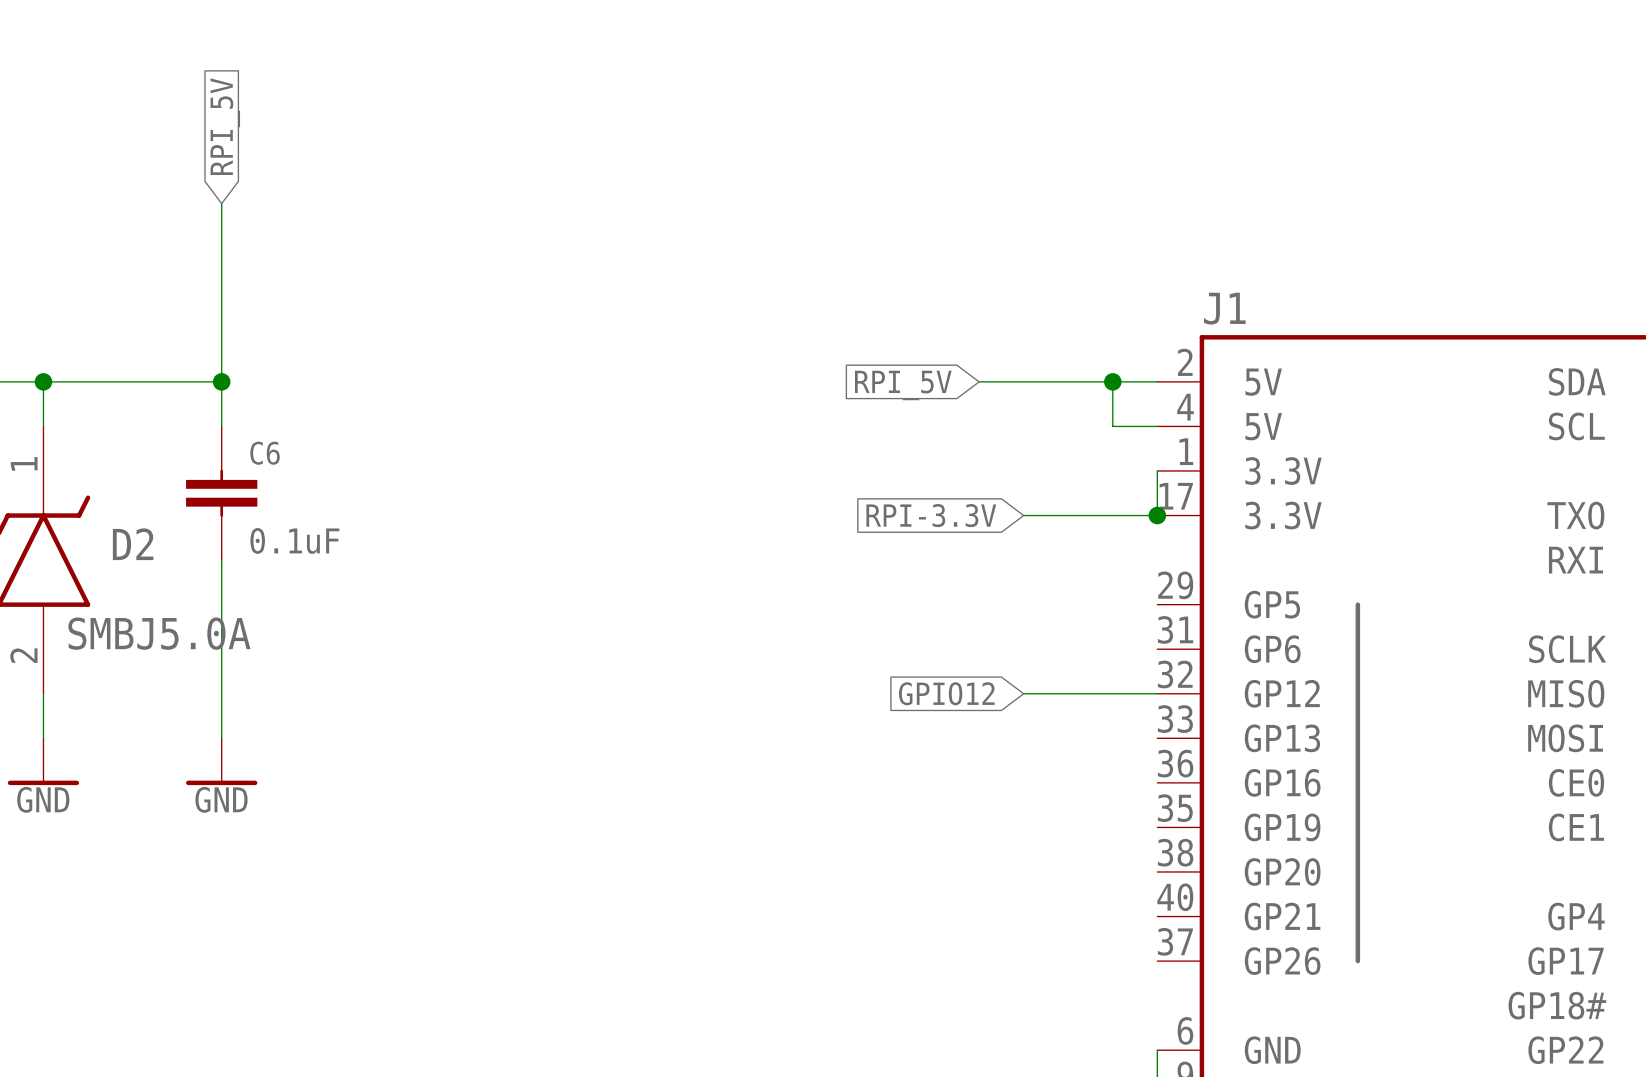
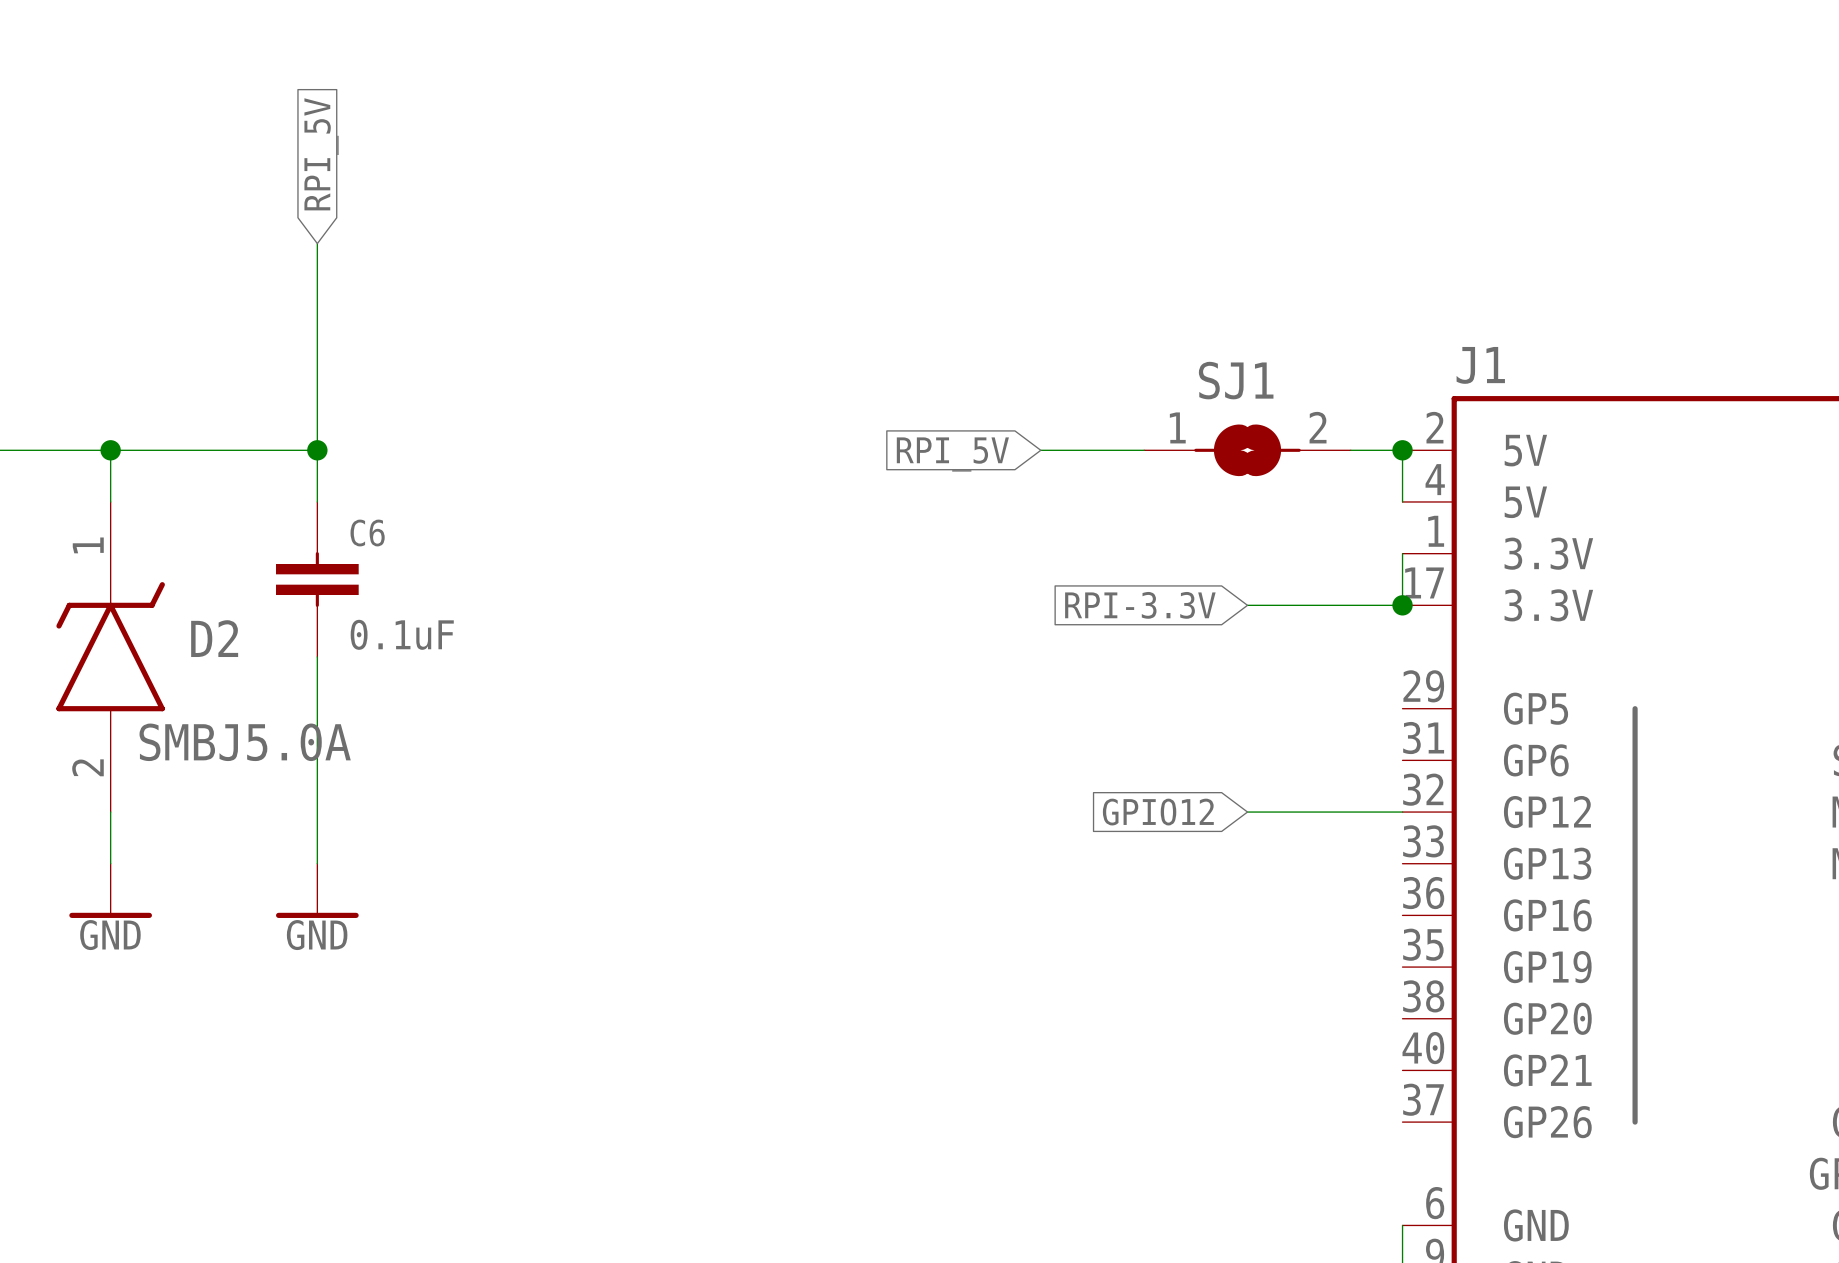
wire: none -> (1040, 450) (1144, 450)
wire: (979, 381) (1112, 381) (1112, 426) (1157, 426) -> (1402, 450) (1402, 501)
SJ1: none -> (1247, 450)
junction position: (1112, 381) -> (1402, 450)
global label position: RPI_5V (903, 385) -> RPI_5V (952, 454)

